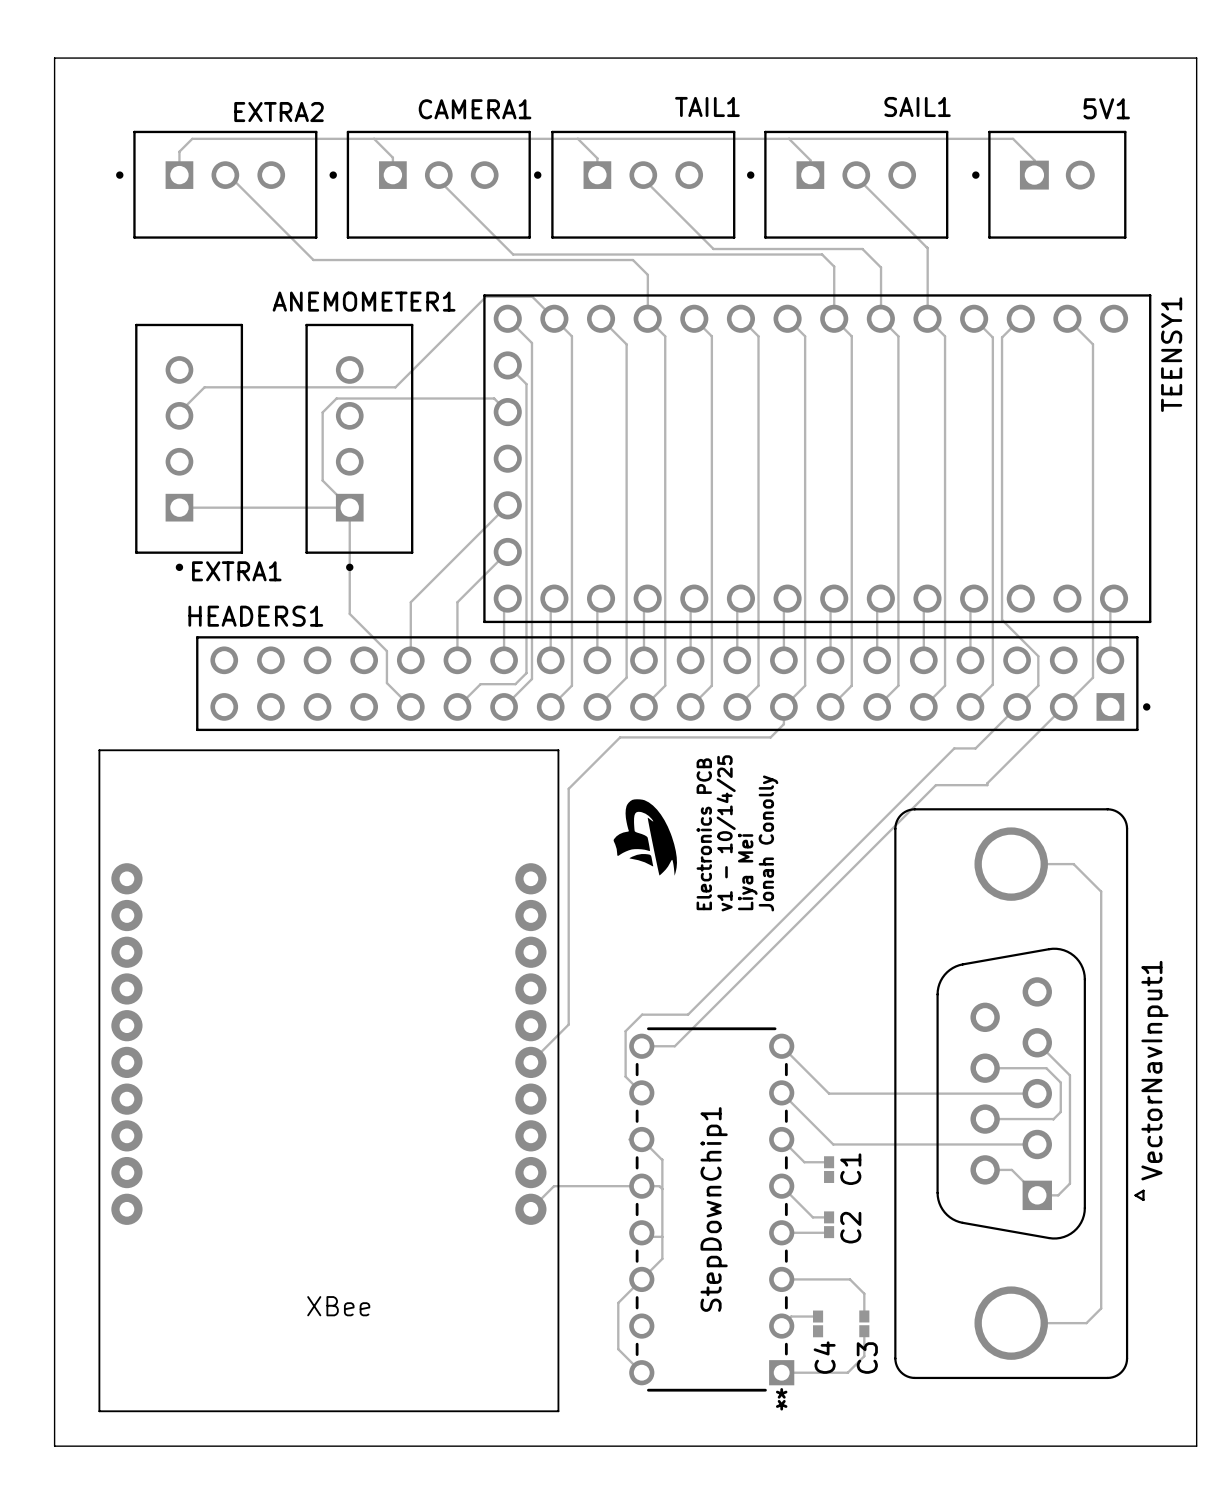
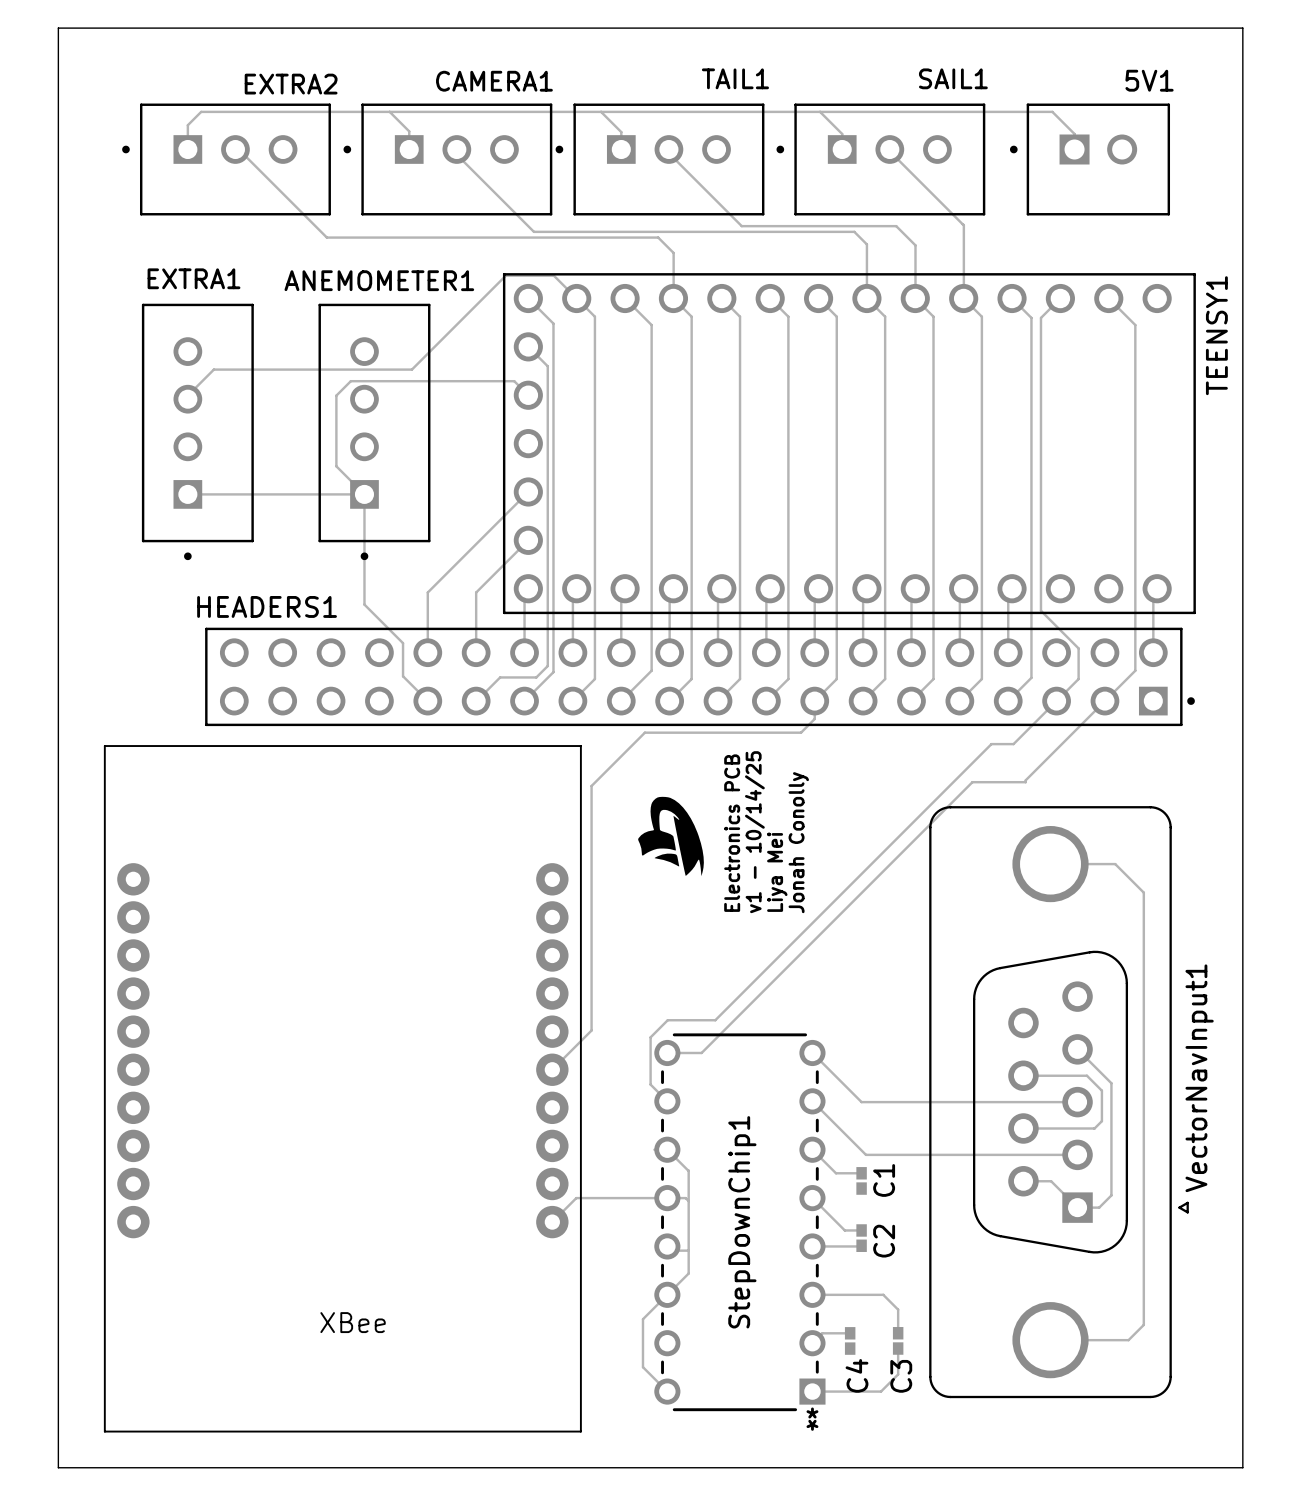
EXTRA1 name position: EXTRA1 (236, 571) -> EXTRA1 (194, 278)

